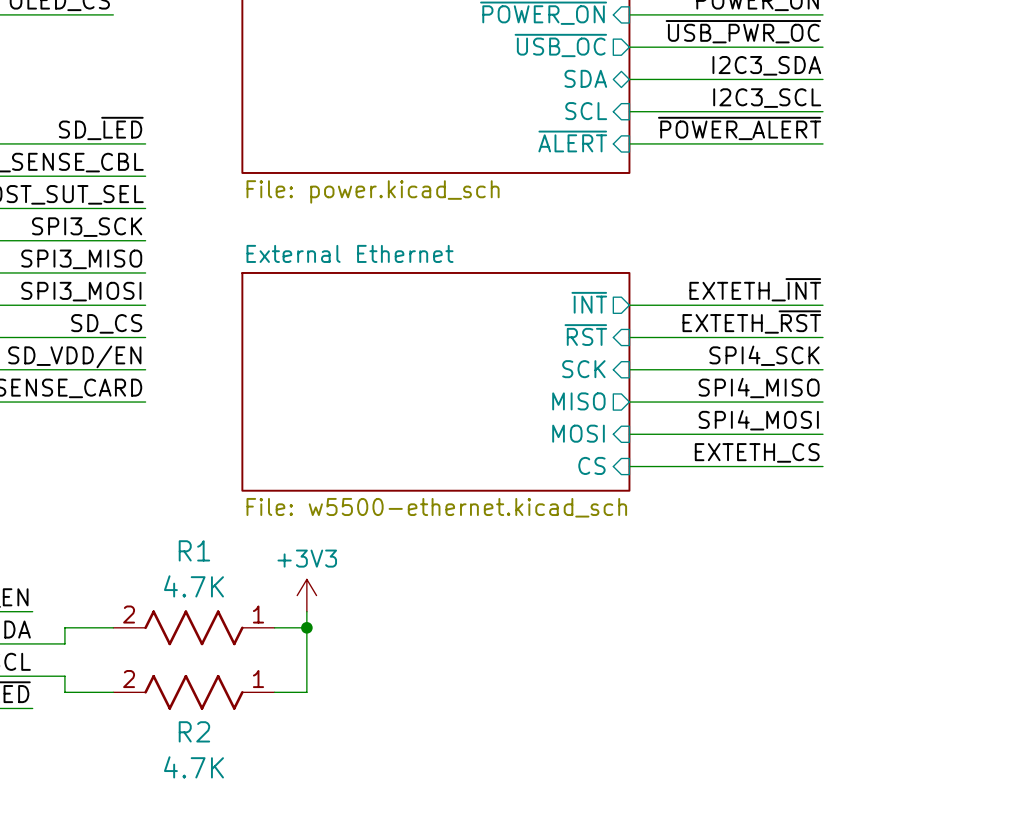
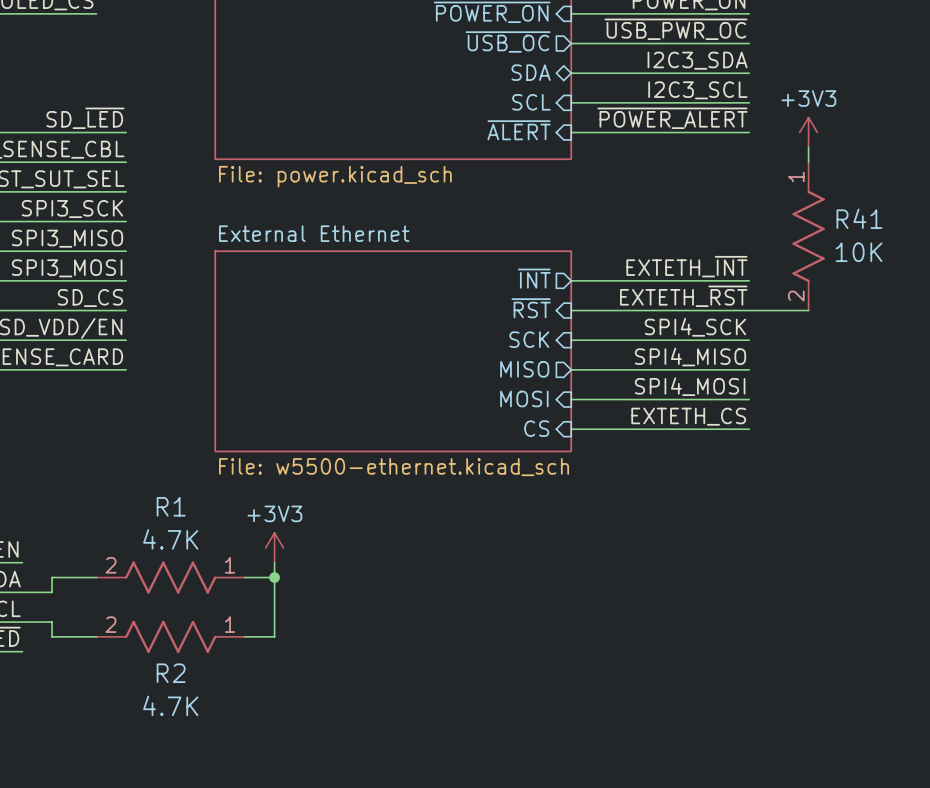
power symbol: none -> +3V3 (808, 132)
wire: none -> (808, 147) (808, 162)
R41: none -> 10K (808, 236)
wire: none -> (749, 310) (808, 310)

